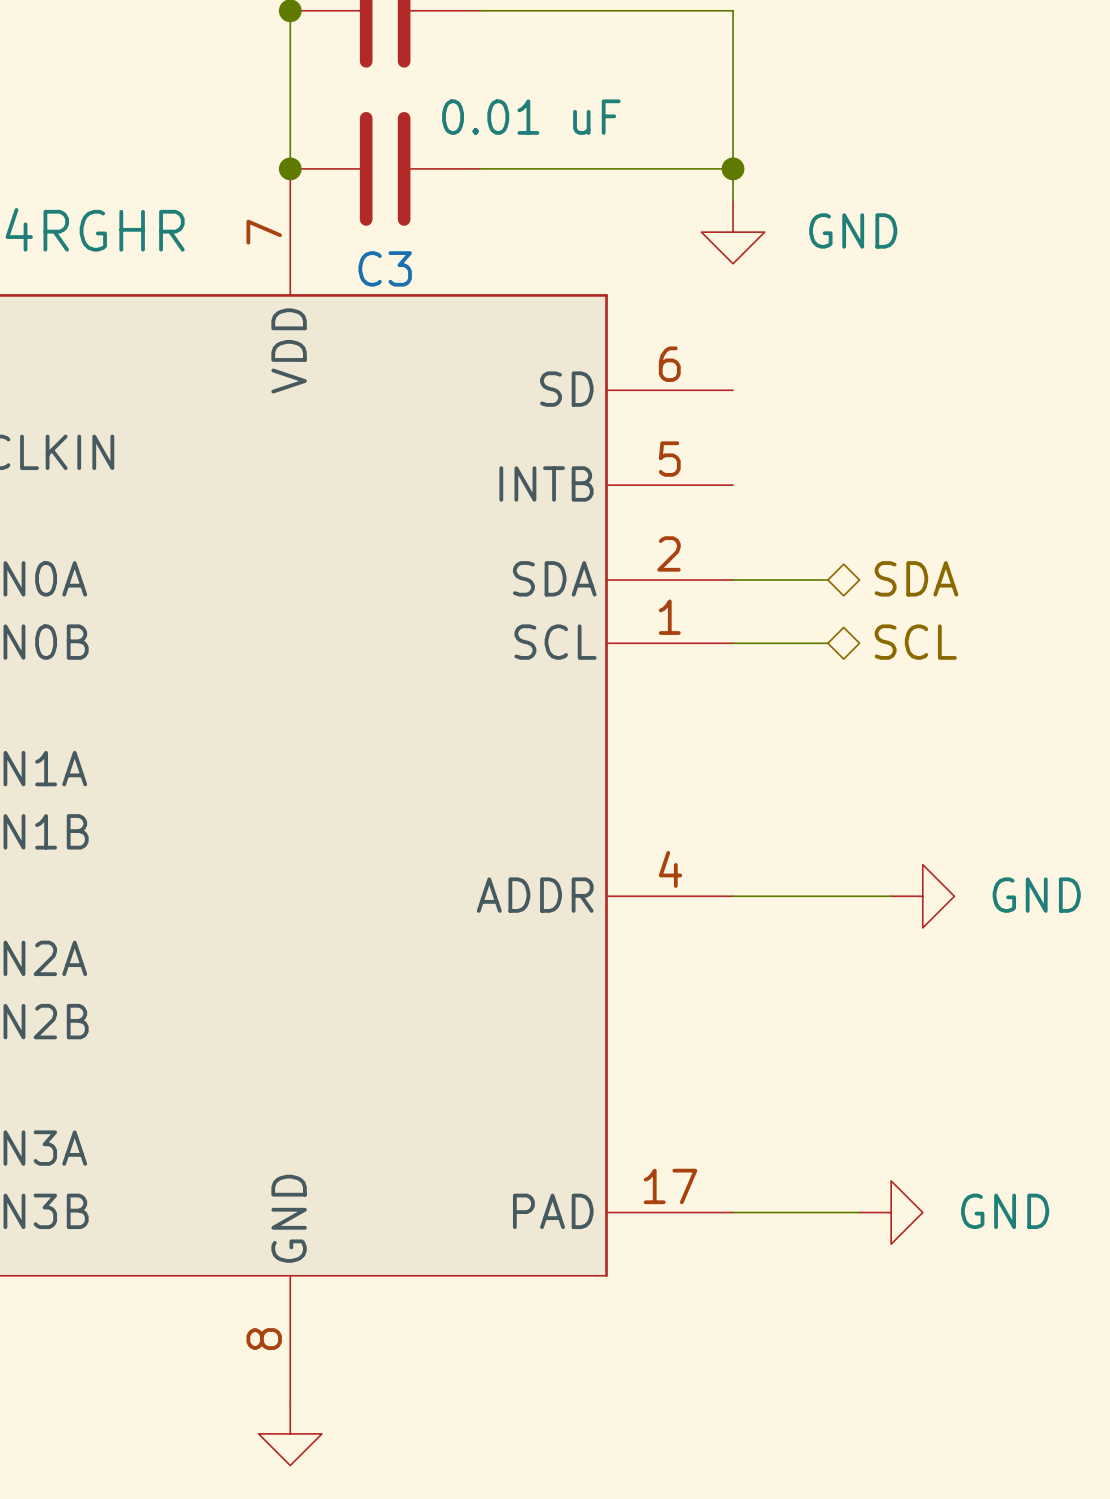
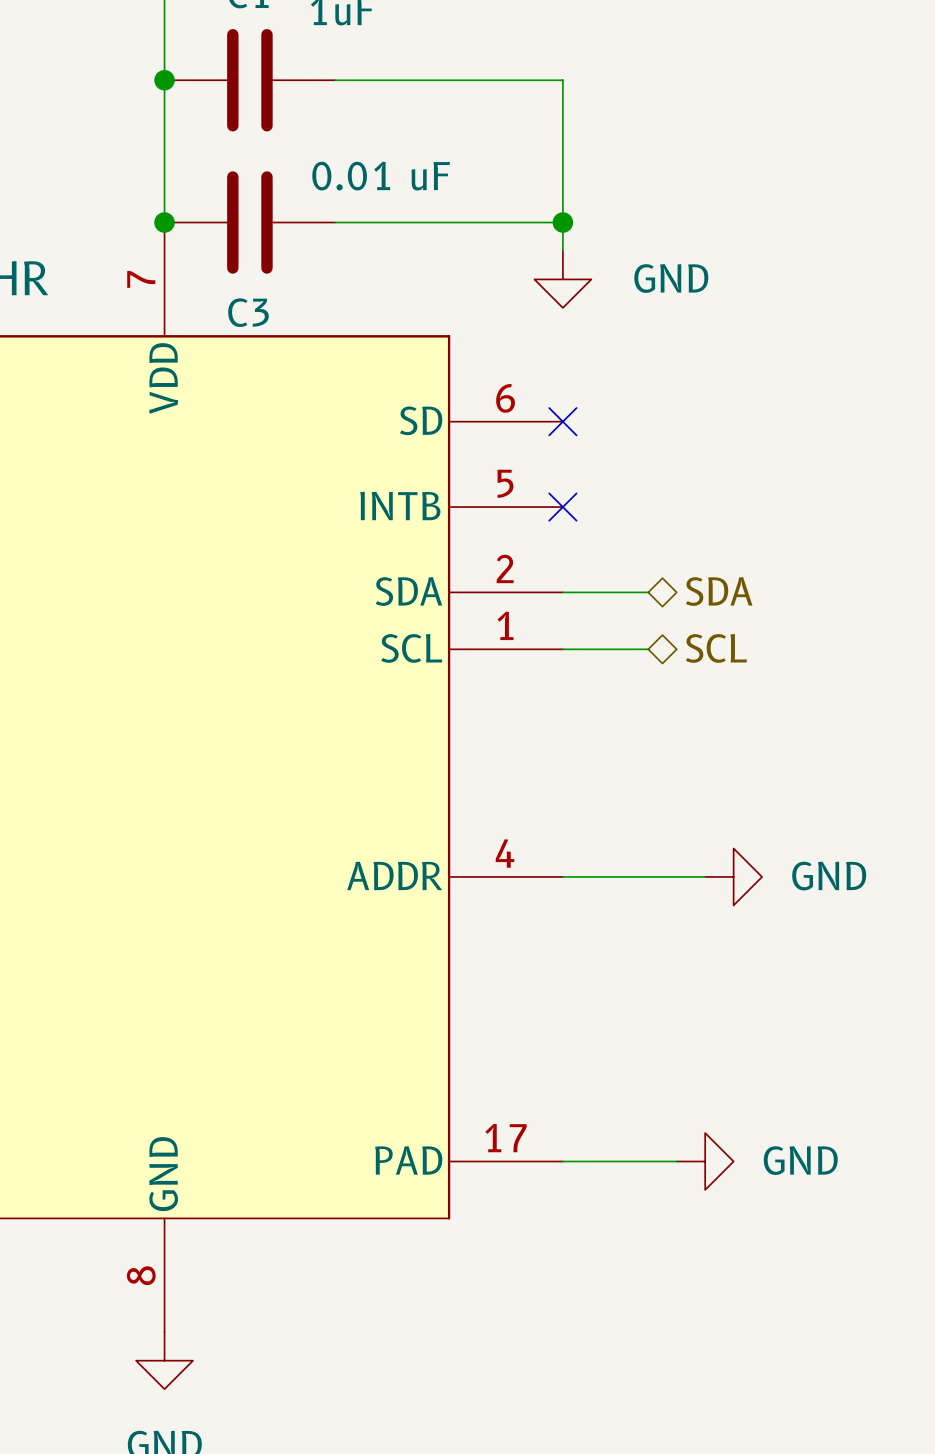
no-connect mark: none -> (562, 421)
no-connect mark: none -> (562, 507)

